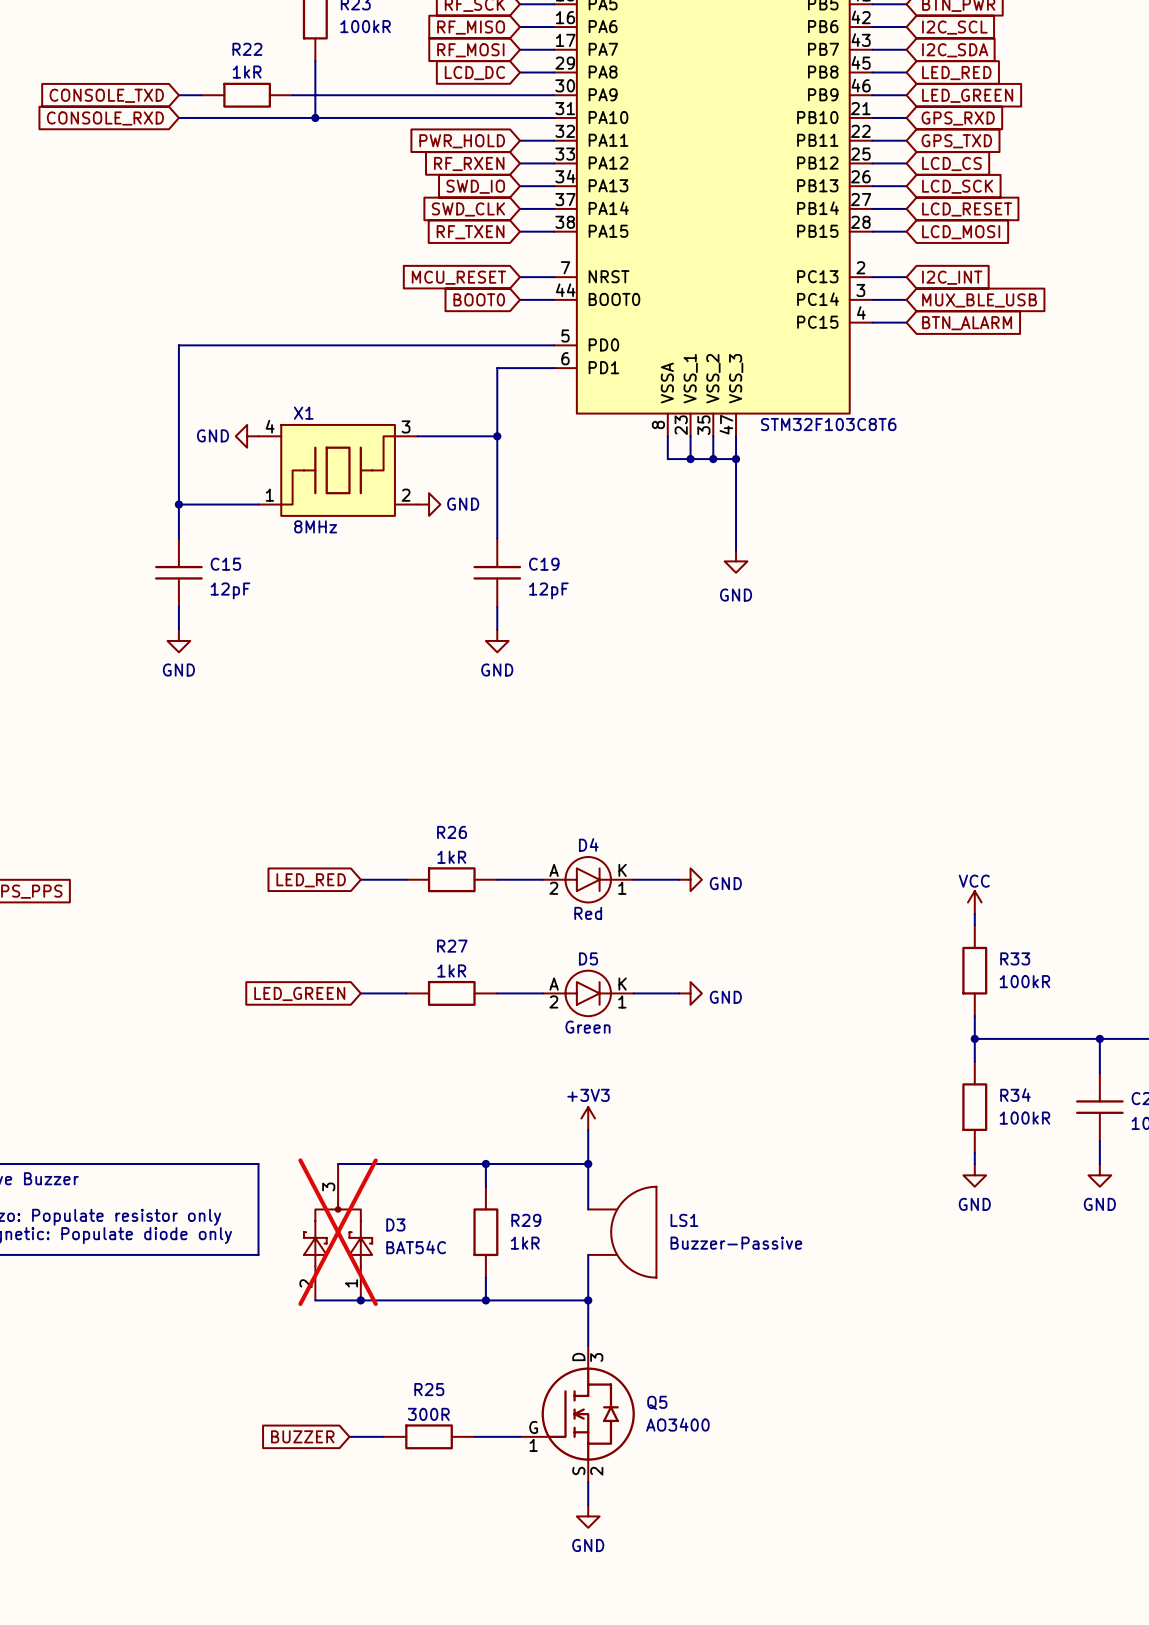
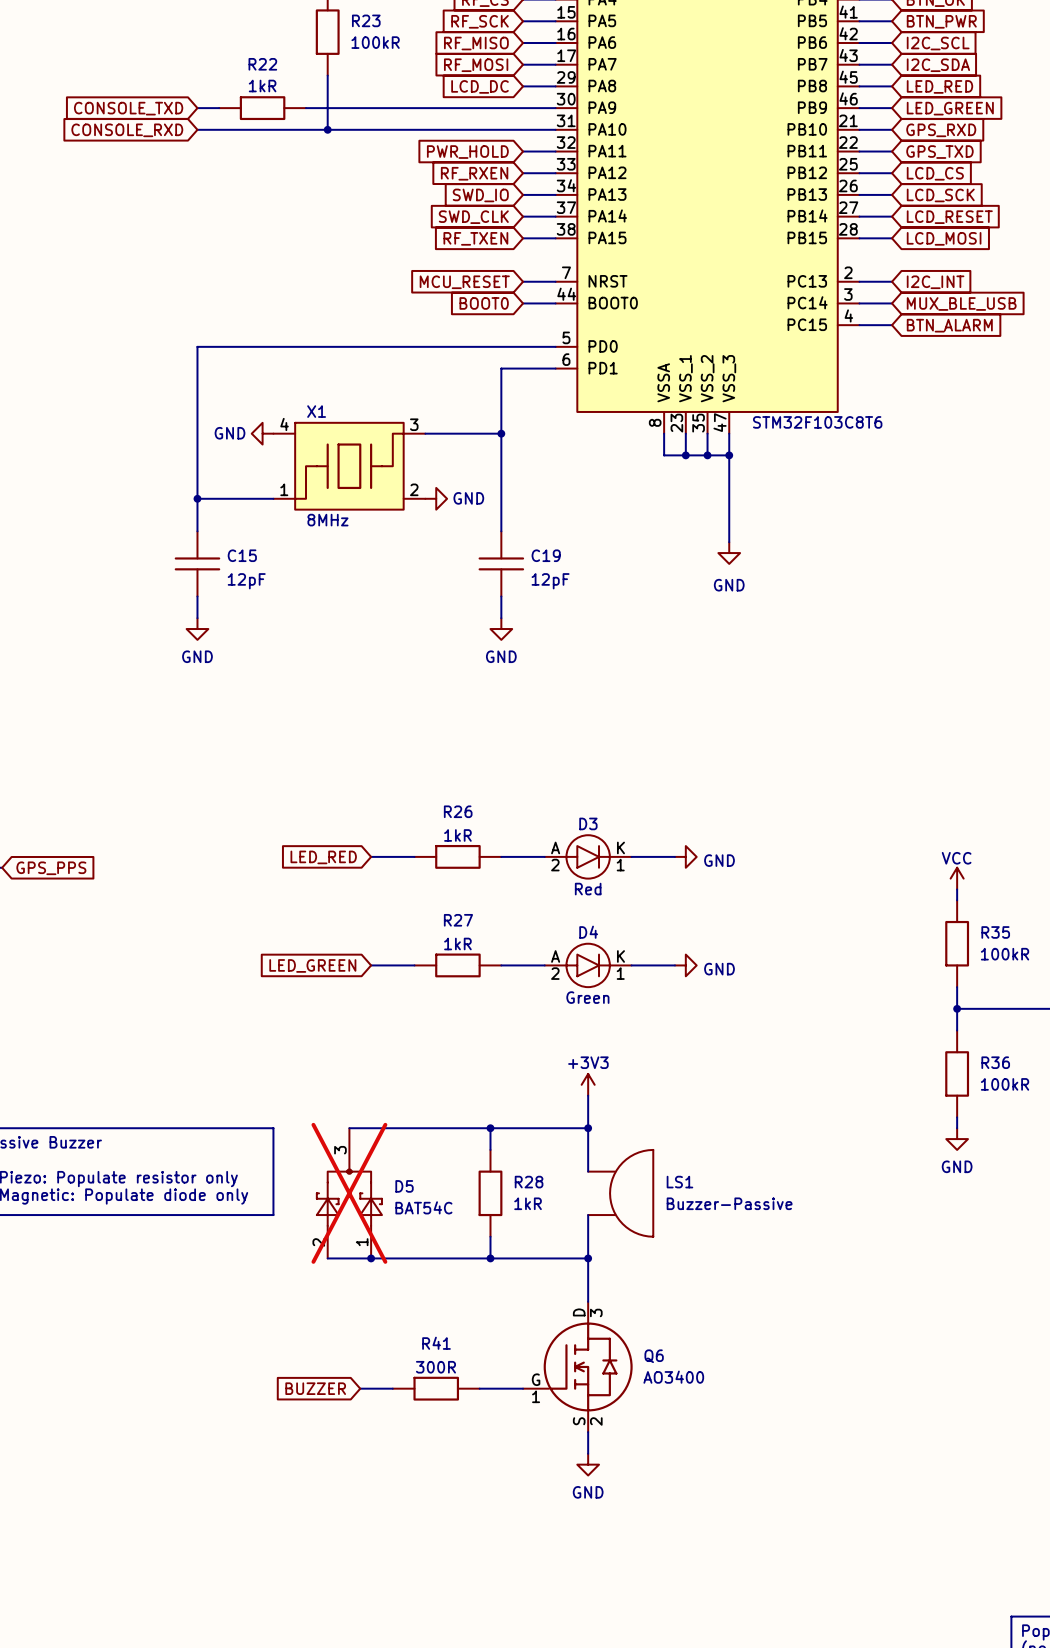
D4 name: D4 (588, 844) -> D3 (588, 823)
D5 name: D5 (588, 958) -> D4 (588, 932)
R33 name: R33 (1015, 958) -> R35 (995, 932)
R34 name: R34 (1015, 1095) -> R36 (995, 1062)
R29 name: R29 (526, 1220) -> R28 (529, 1182)
D3 name: D3 (395, 1224) -> D5 (404, 1186)
R25 name: R25 (429, 1389) -> R41 (436, 1343)
Q5 name: Q5 (657, 1402) -> Q6 (654, 1356)

